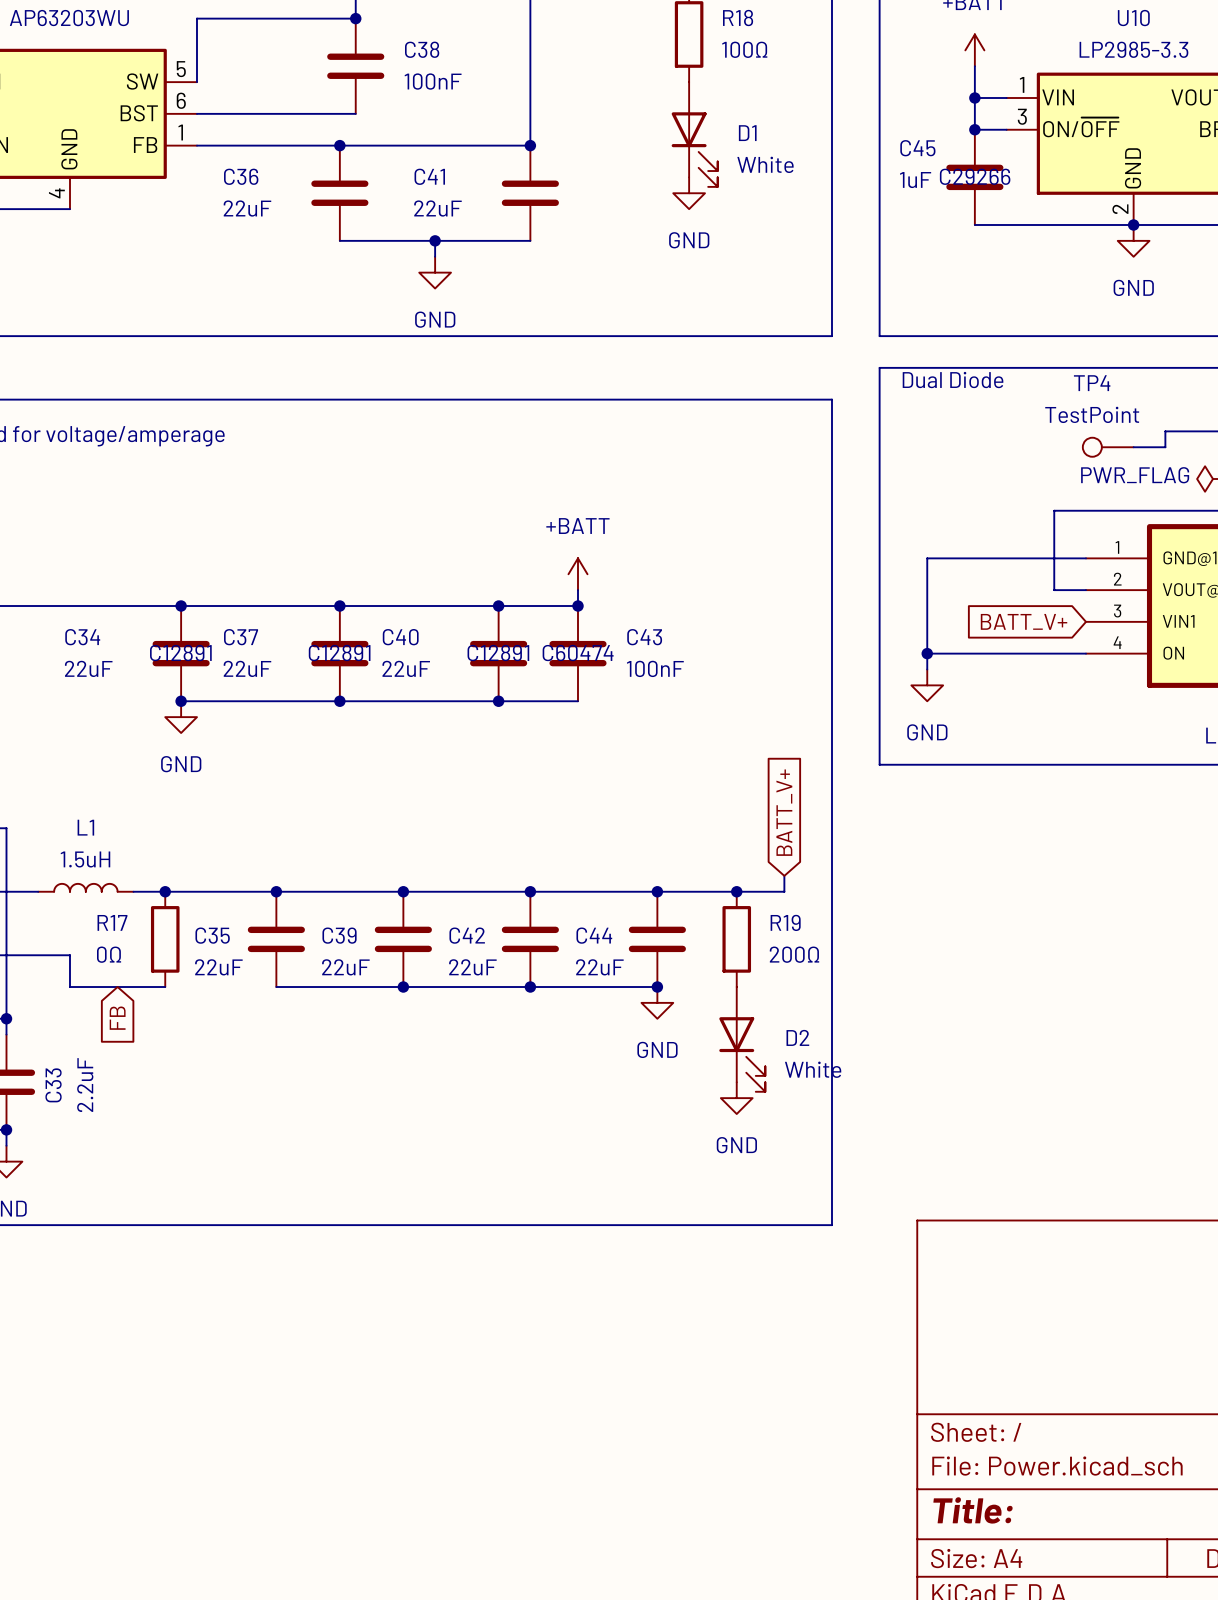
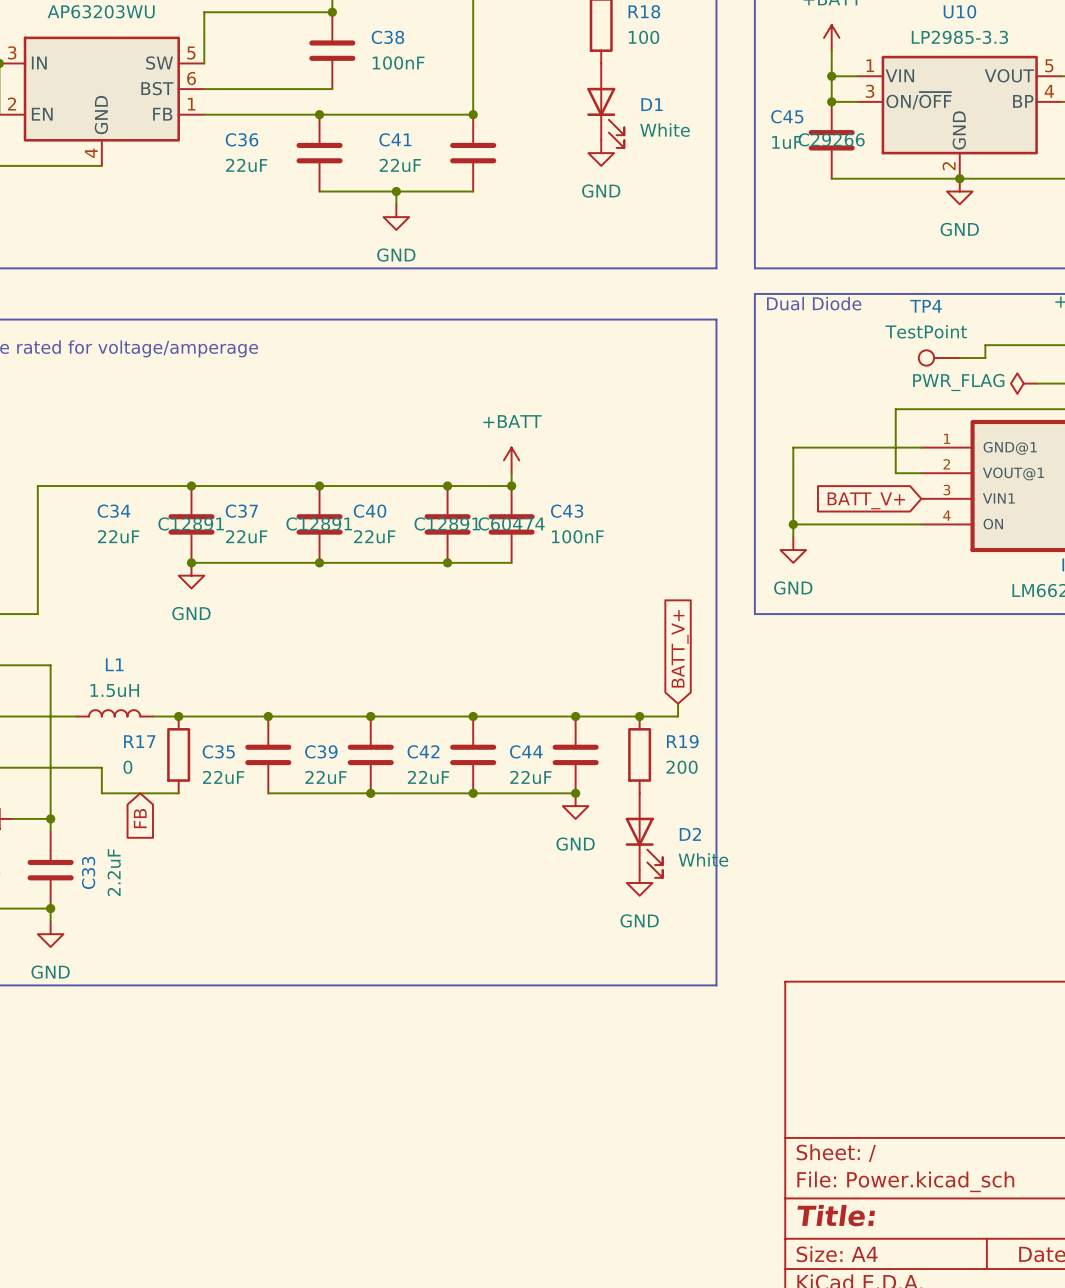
R18 value: 100Ω (744, 49) -> 100 (643, 37)
R17 value: 0Ω (109, 954) -> 0 (127, 767)
R19 value: 200Ω (794, 954) -> 200 (682, 767)

